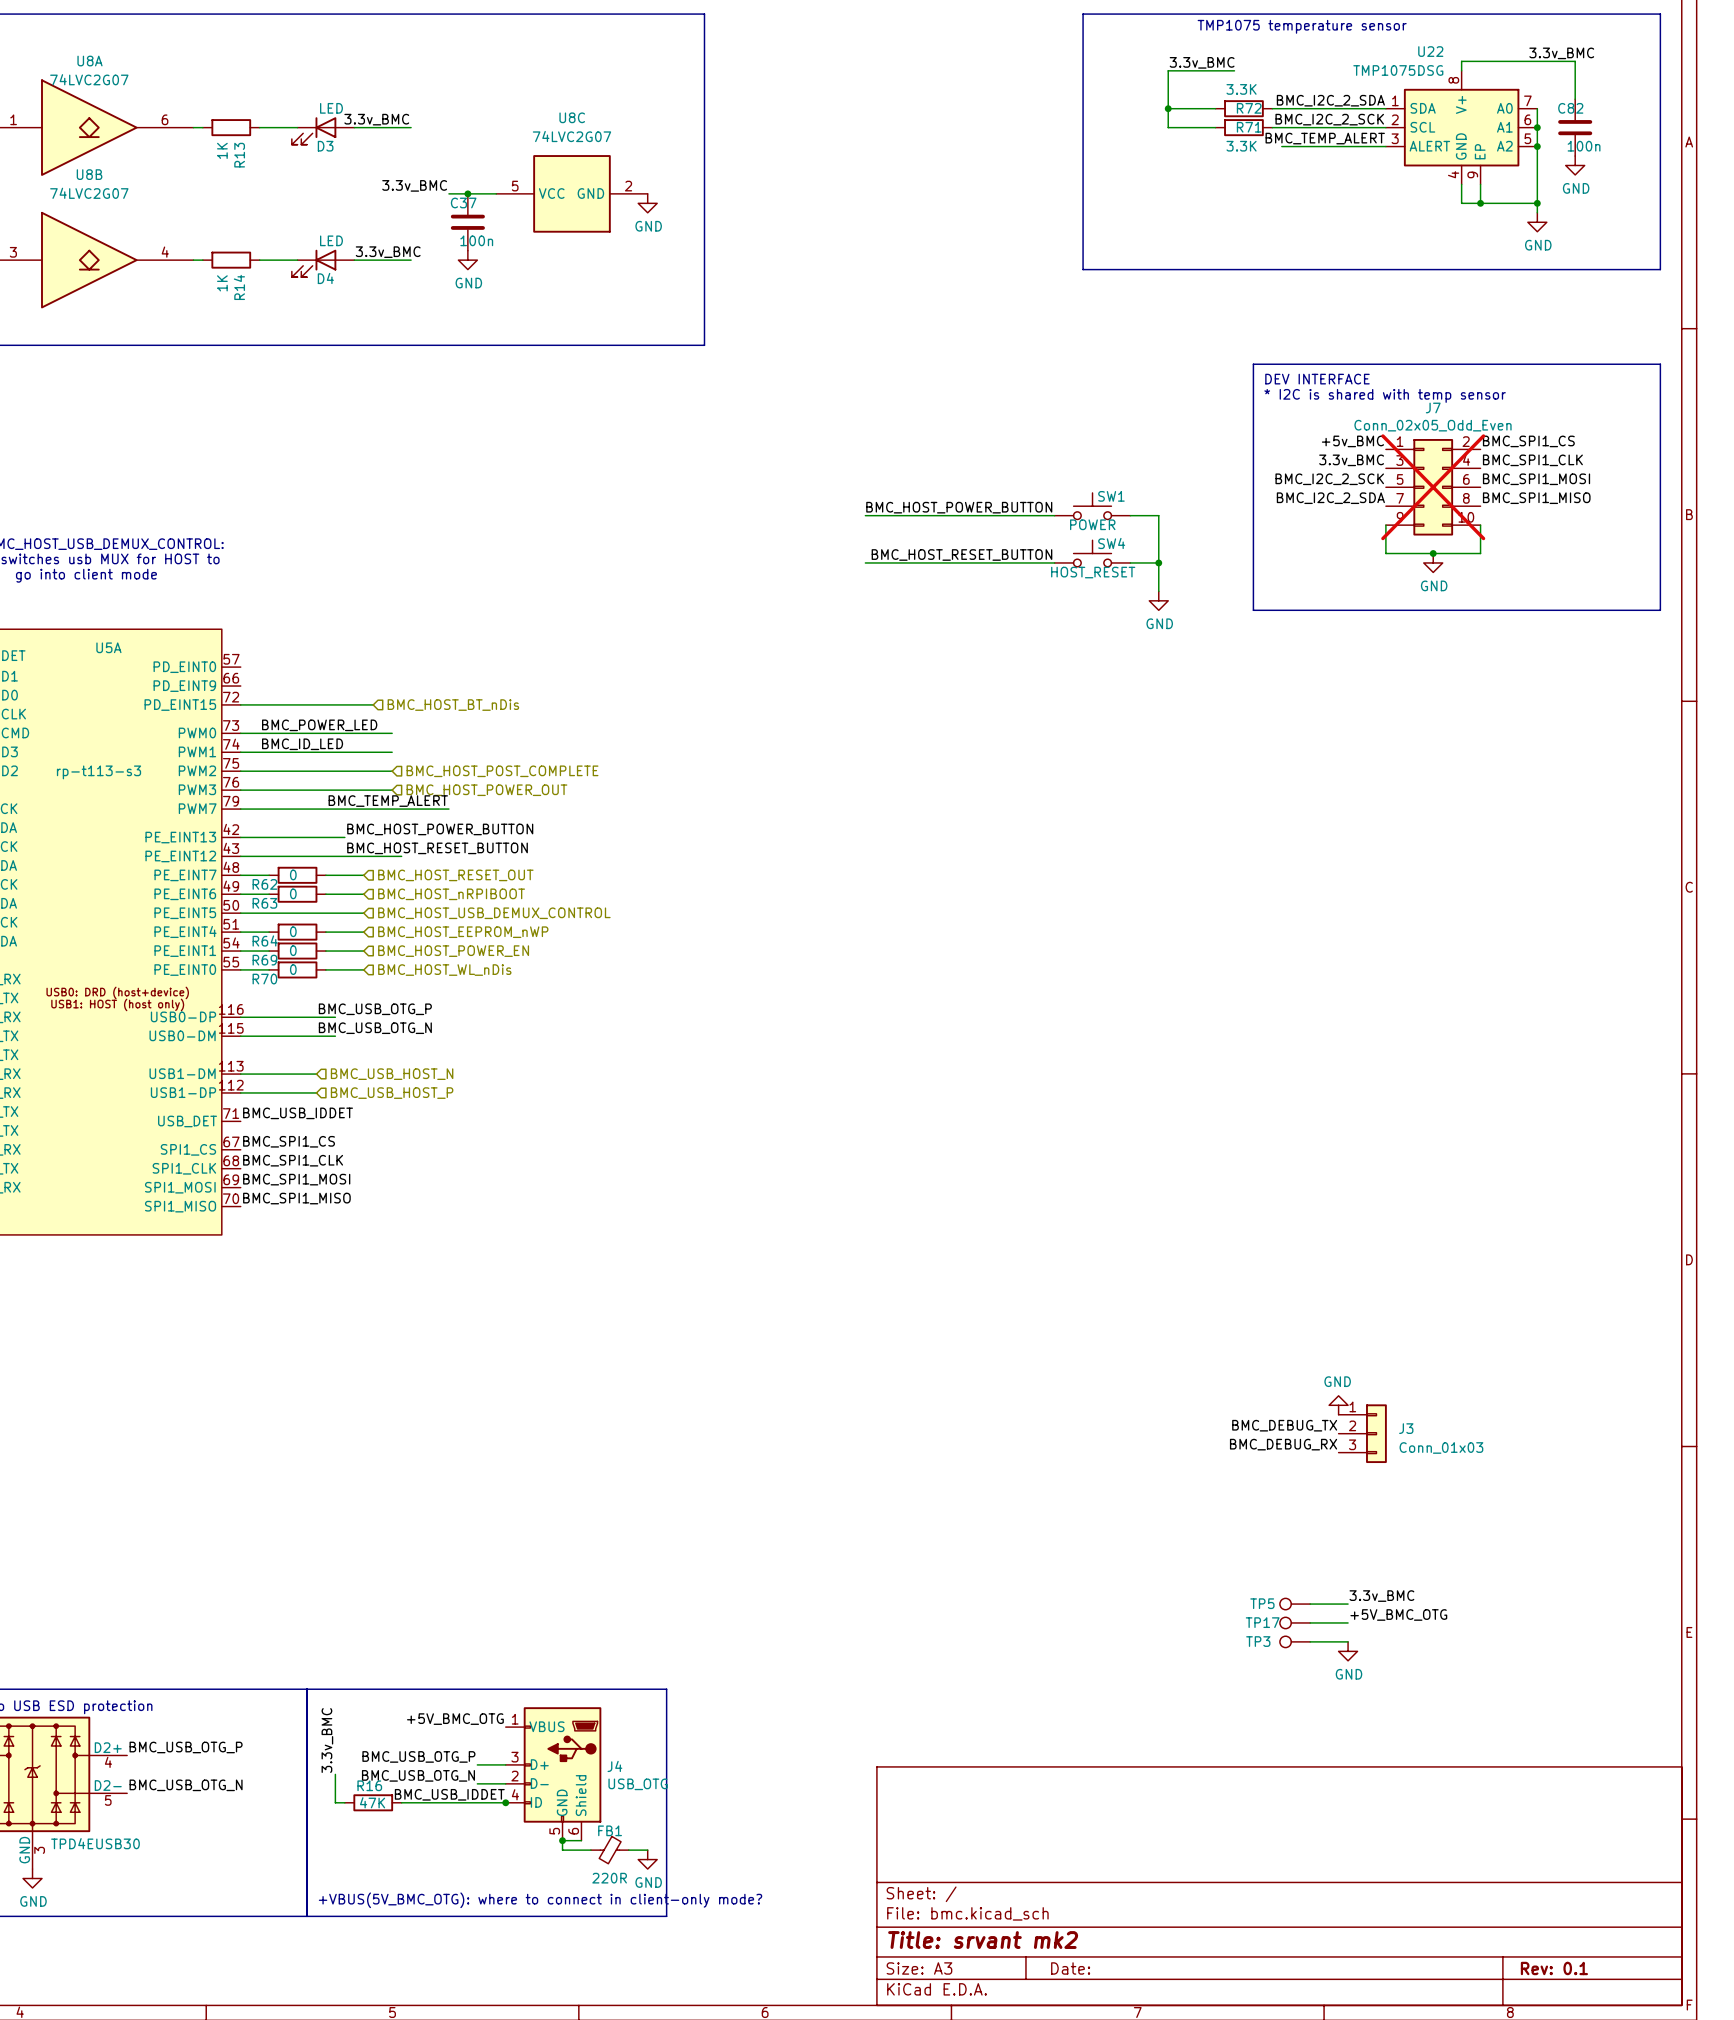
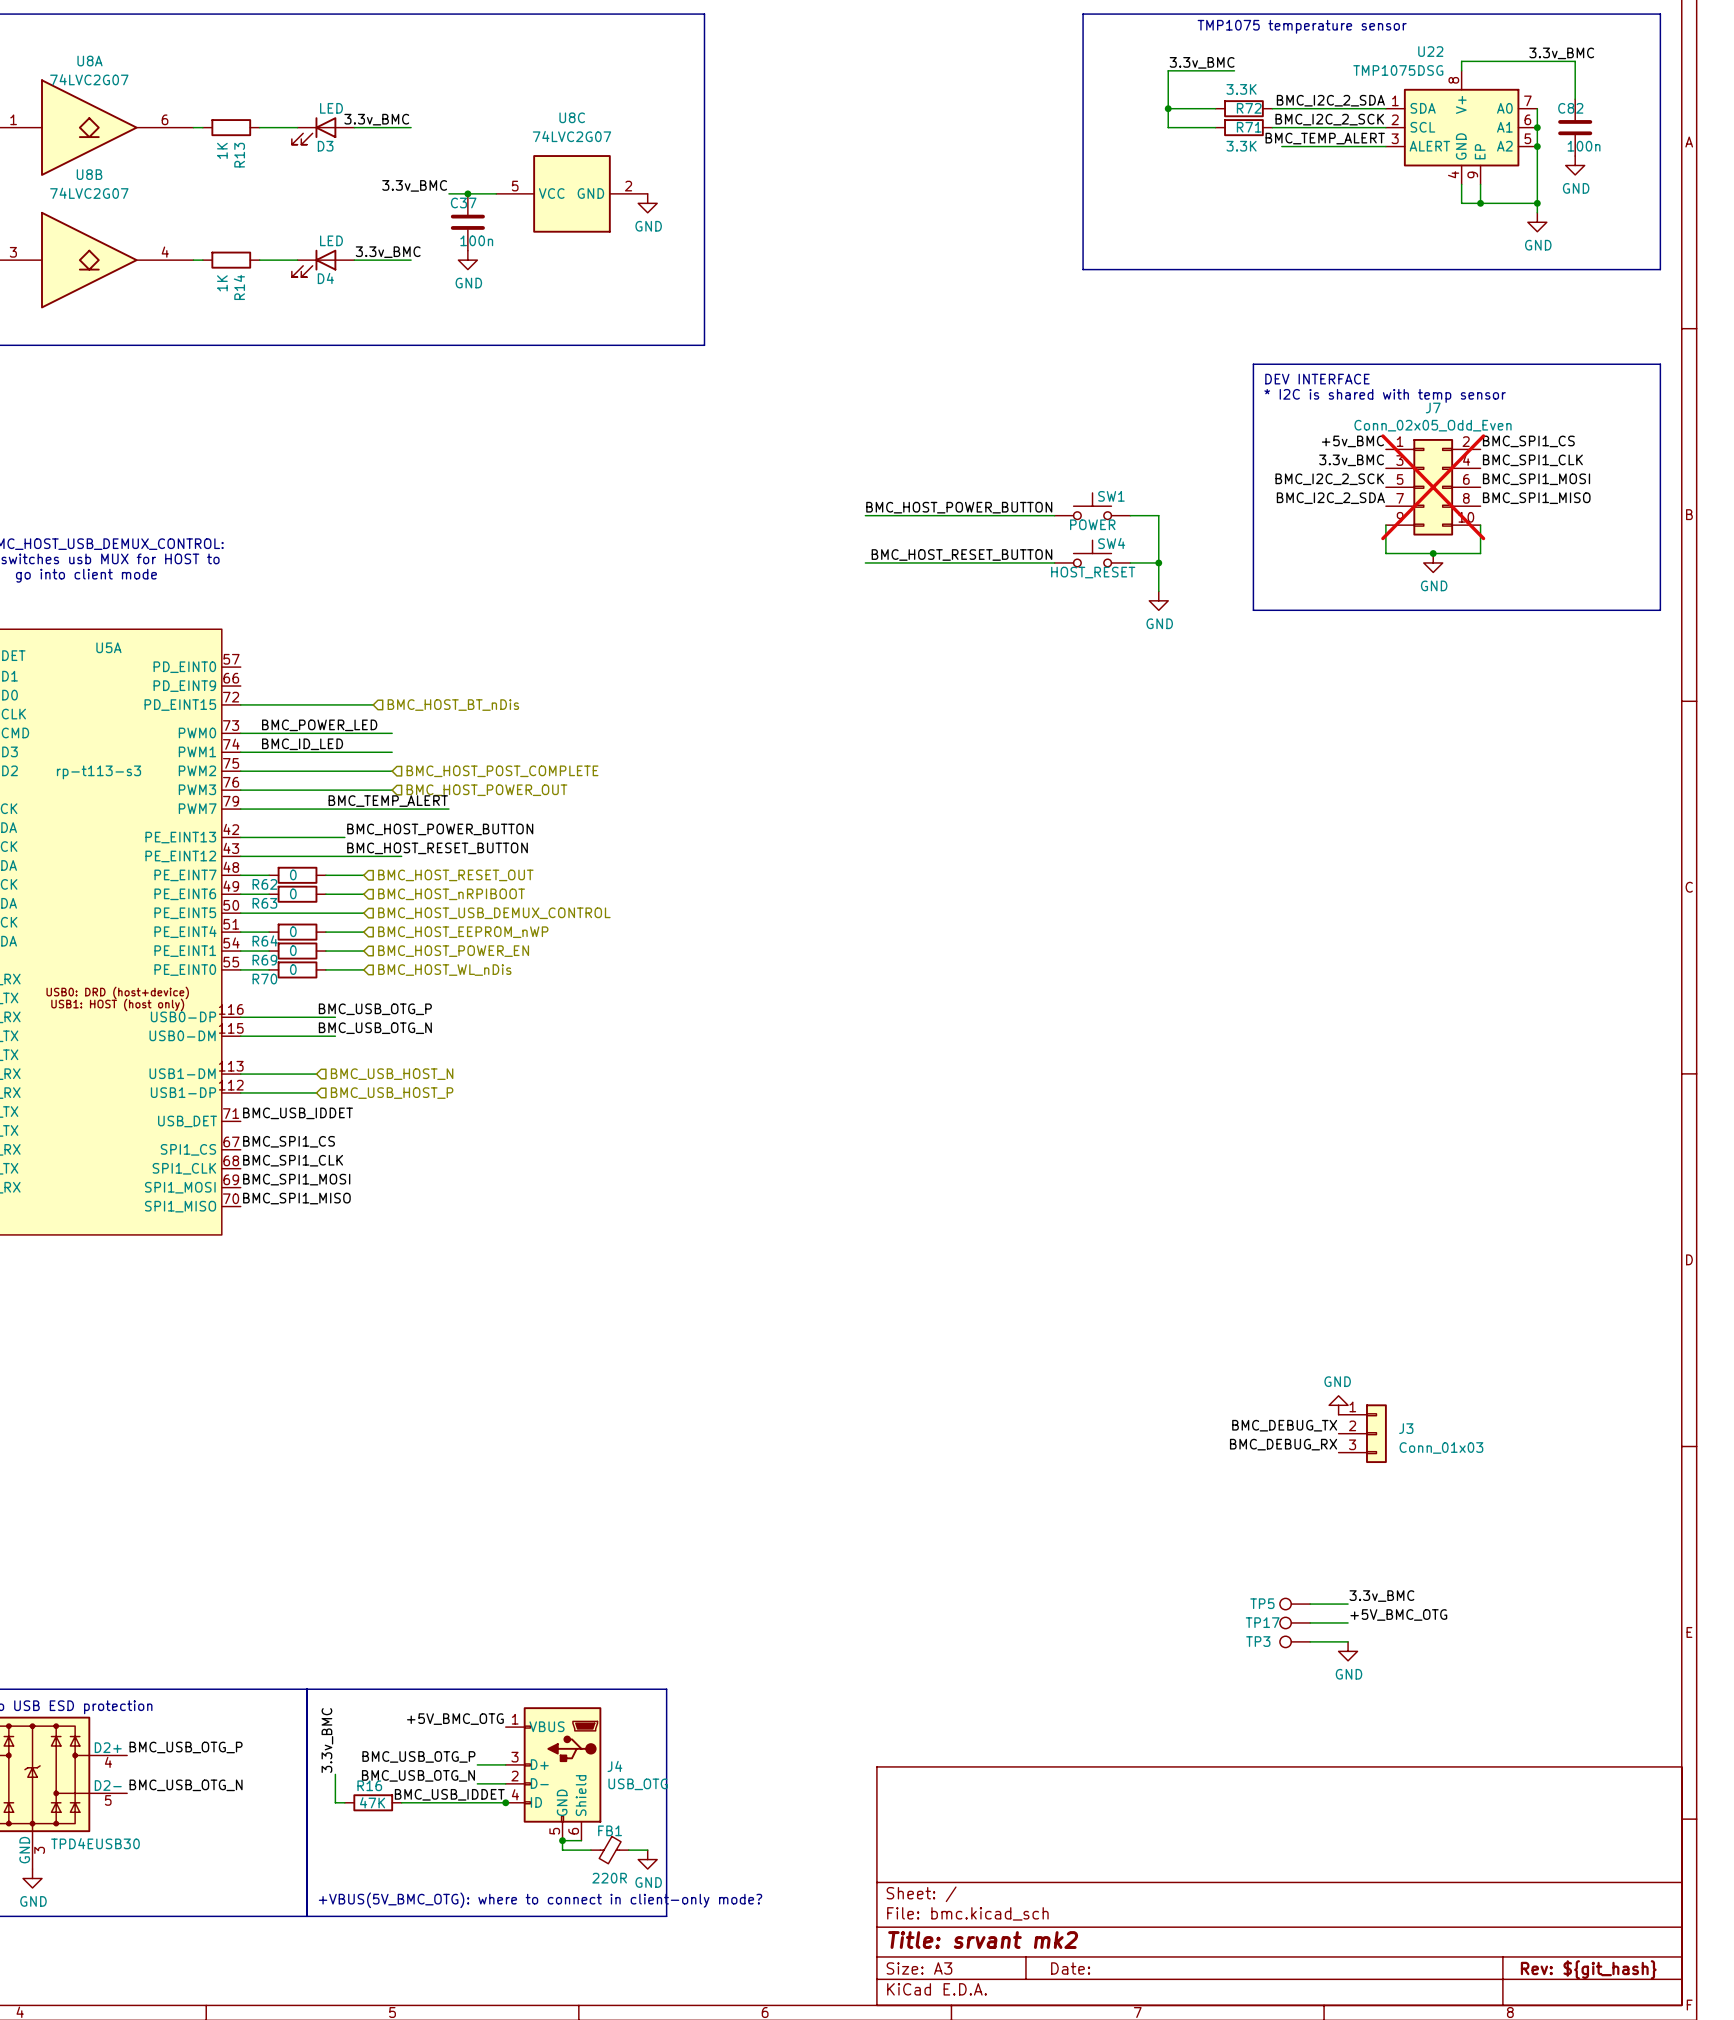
title block: Rev: 0.1 (1554, 1968) -> Rev: ${git_hash} (1588, 1969)

